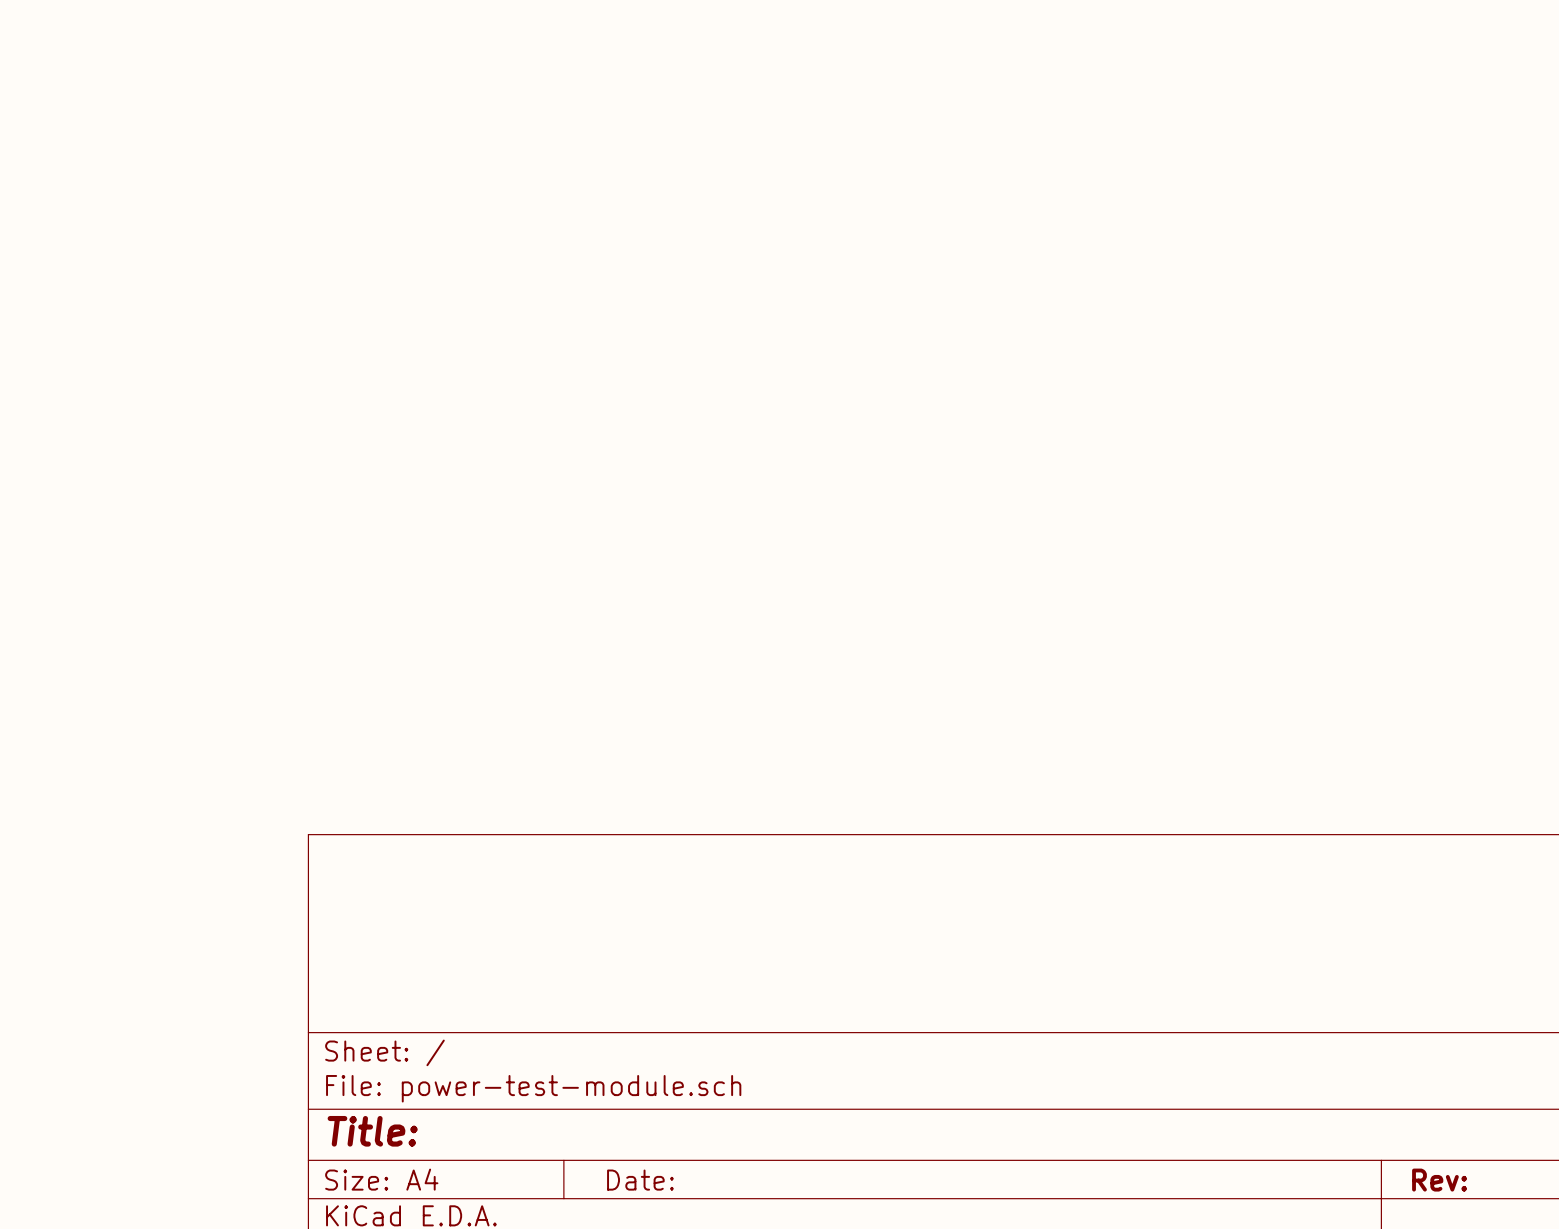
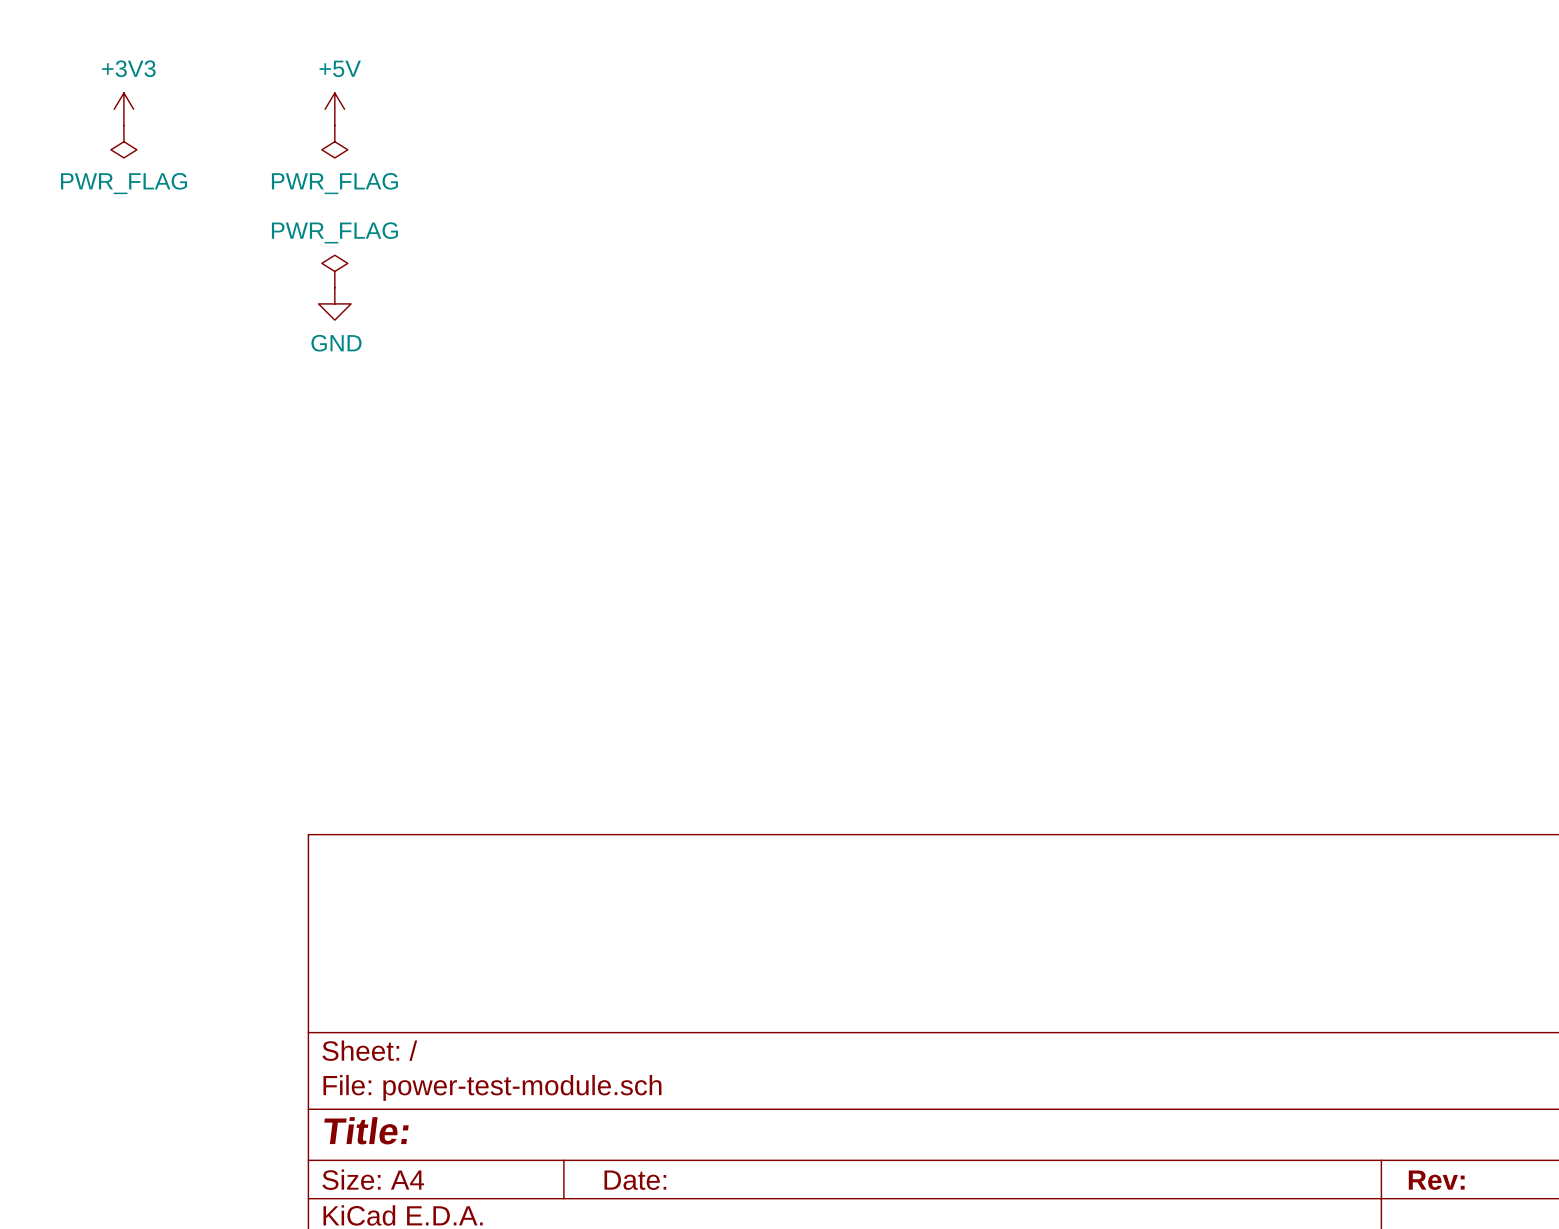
power symbol: none -> +3V3 (123, 109)
power symbol: none -> +5V (334, 109)
power symbol: none -> PWR_FLAG (123, 141)
power symbol: none -> PWR_FLAG (334, 141)
power symbol: none -> PWR_FLAG (334, 271)
power symbol: none -> GND (334, 303)

